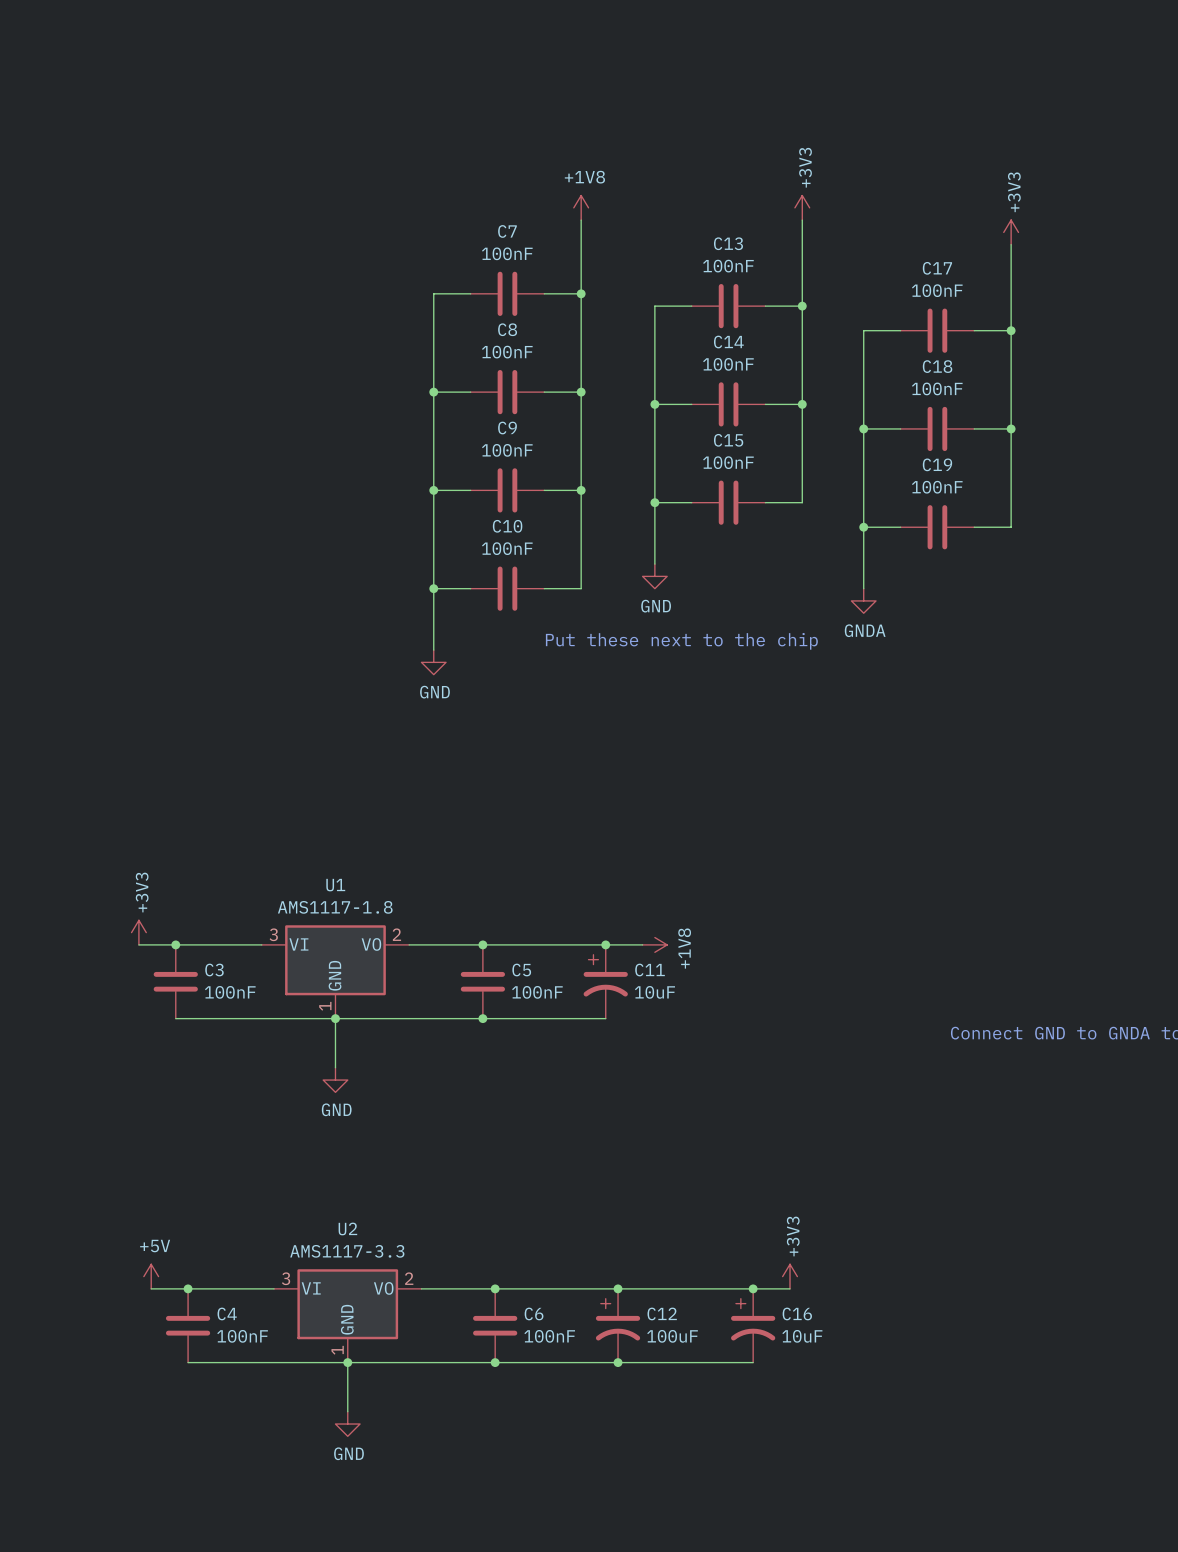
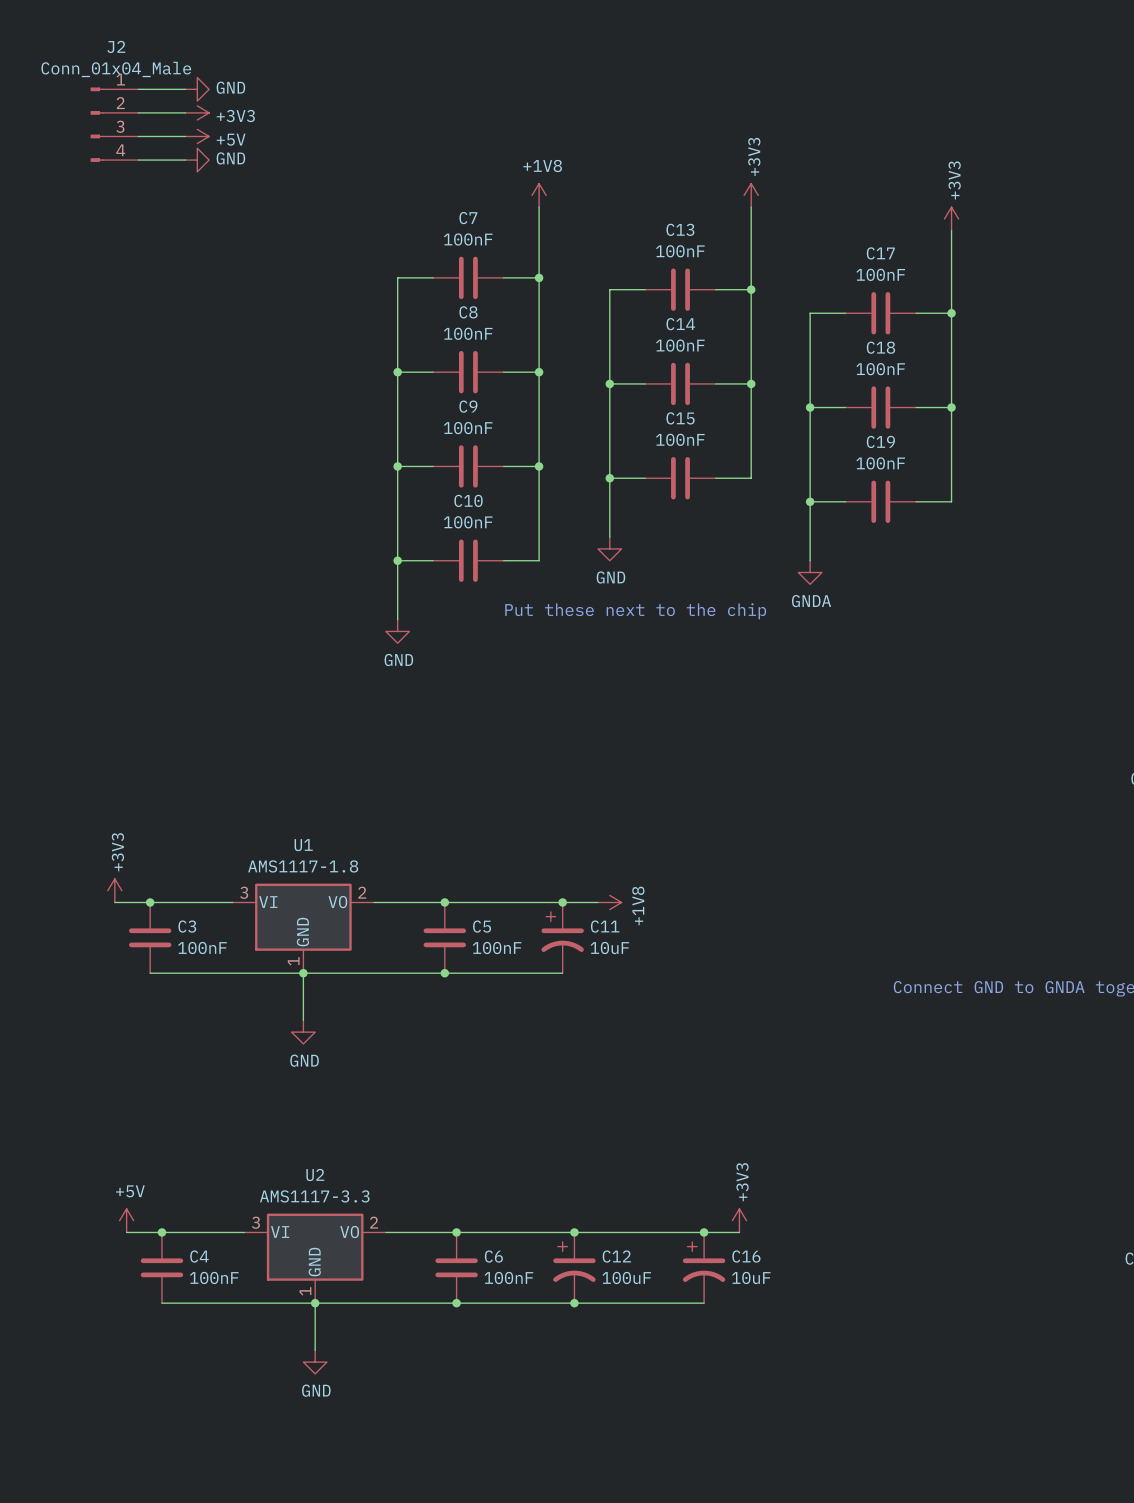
wire: none -> (138, 89) (185, 89)
power symbol: none -> GND (197, 89)
wire: none -> (138, 112) (185, 112)
power symbol: none -> +3V3 (197, 112)
J2: none -> Conn_01x04_Male (114, 124)
wire: none -> (138, 136) (185, 136)
power symbol: none -> +5V (197, 136)
wire: none -> (138, 160) (185, 160)
power symbol: none -> GND (197, 160)

